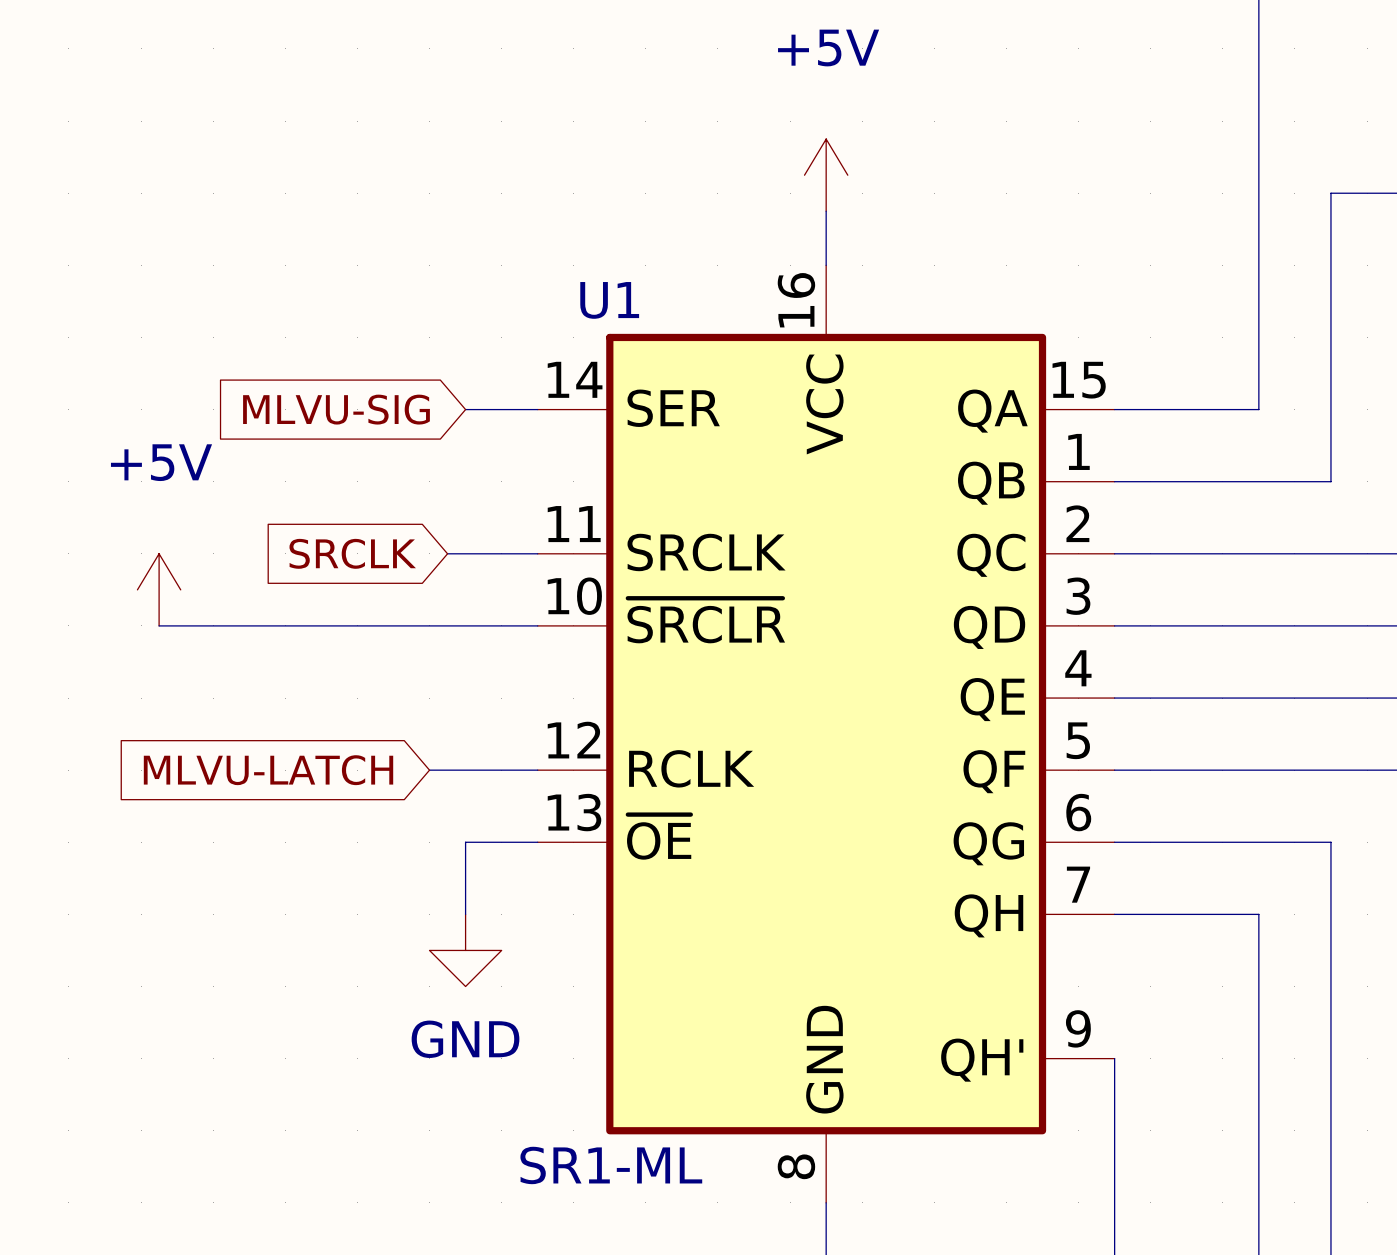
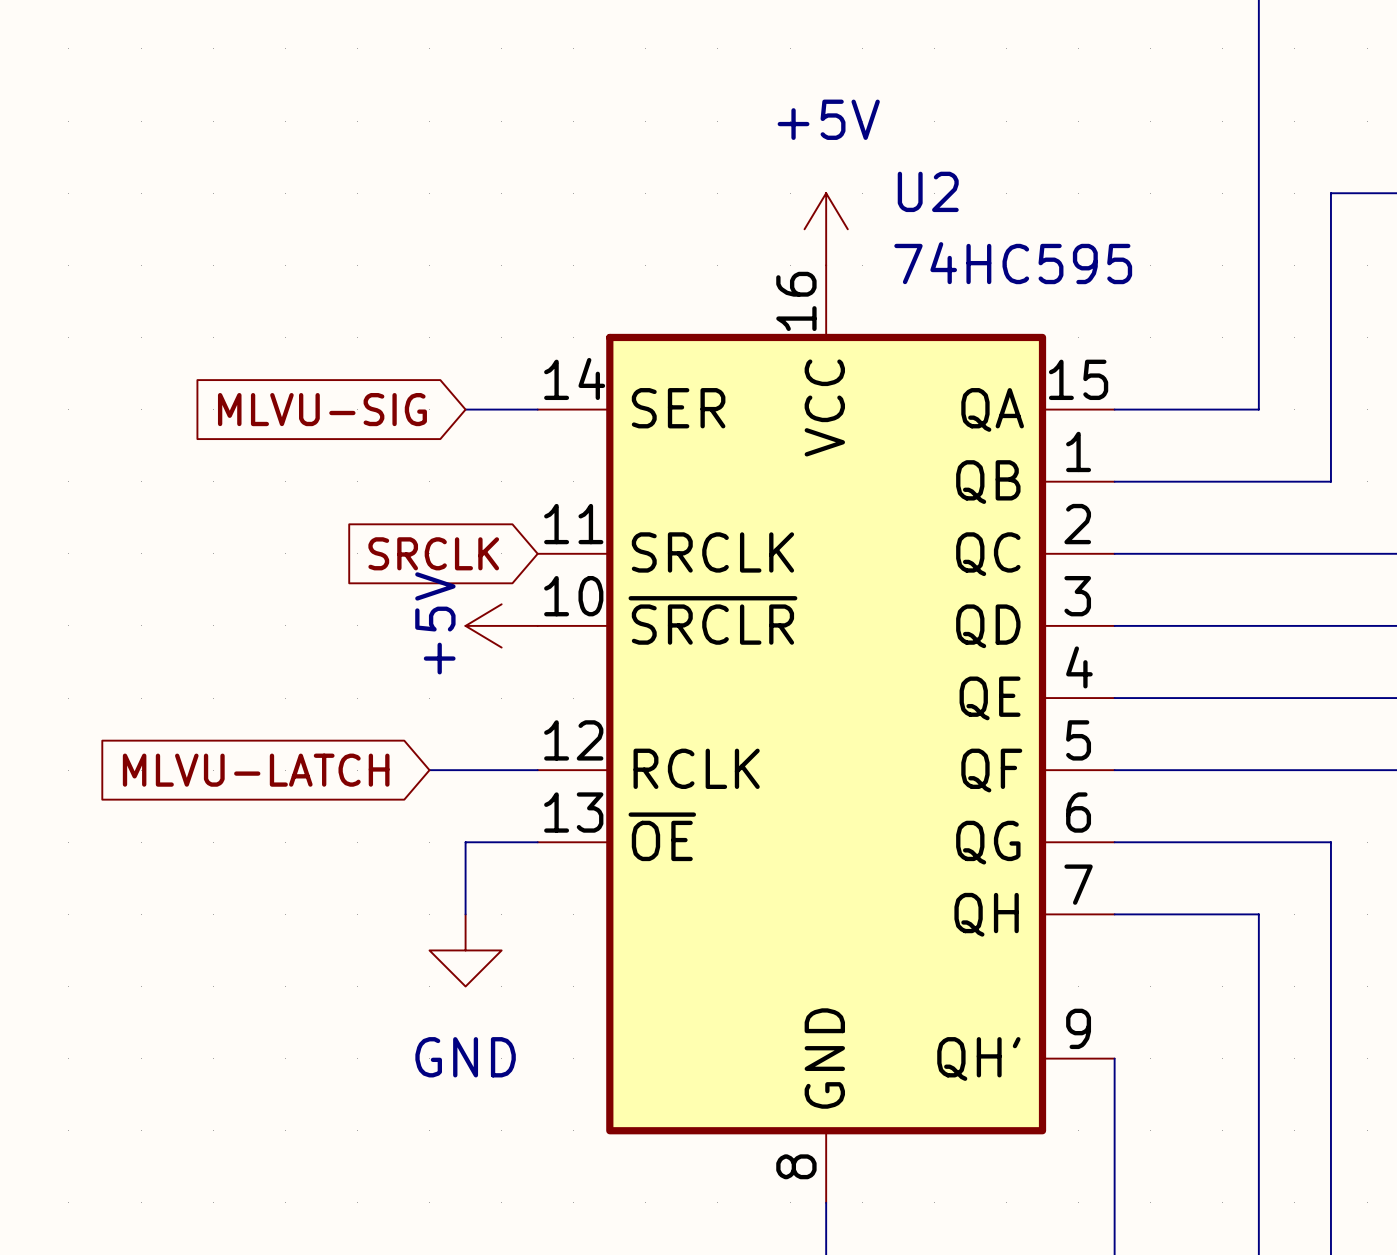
power symbol text position: +5V (828, 48) -> +5V (828, 119)
power symbol position: +5V (826, 175) -> +5V (826, 229)
U1 name: U1 (609, 300) -> U2 (928, 191)
global label position: SRCLK (352, 553) -> SRCLK (433, 553)
wire: (447, 553) (537, 553) -> none
power symbol: +5V (159, 589) -> none
wire: (159, 625) (537, 625) -> none
power symbol: none -> +5V (501, 625)
power symbol text position: GND (465, 1039) -> GND (465, 1057)
U1 value: SR1-ML (611, 1165) -> 74HC595 (1013, 263)

